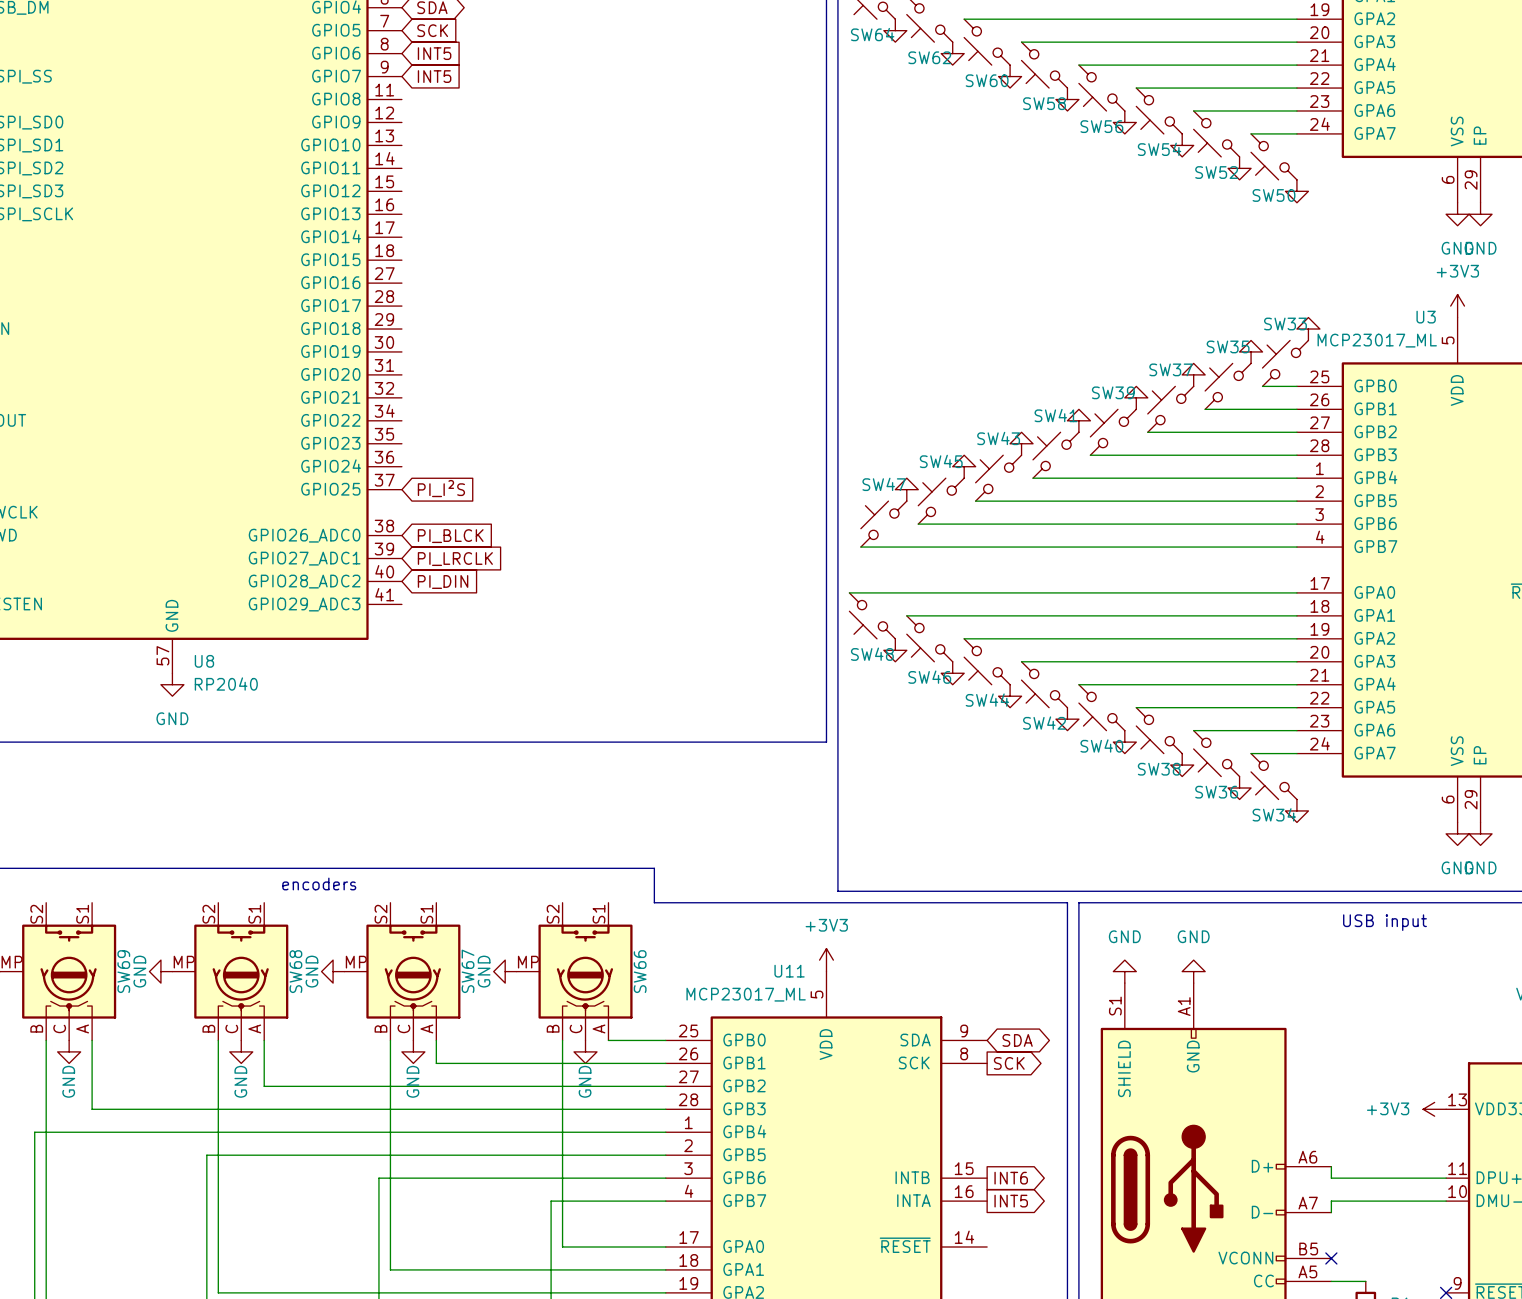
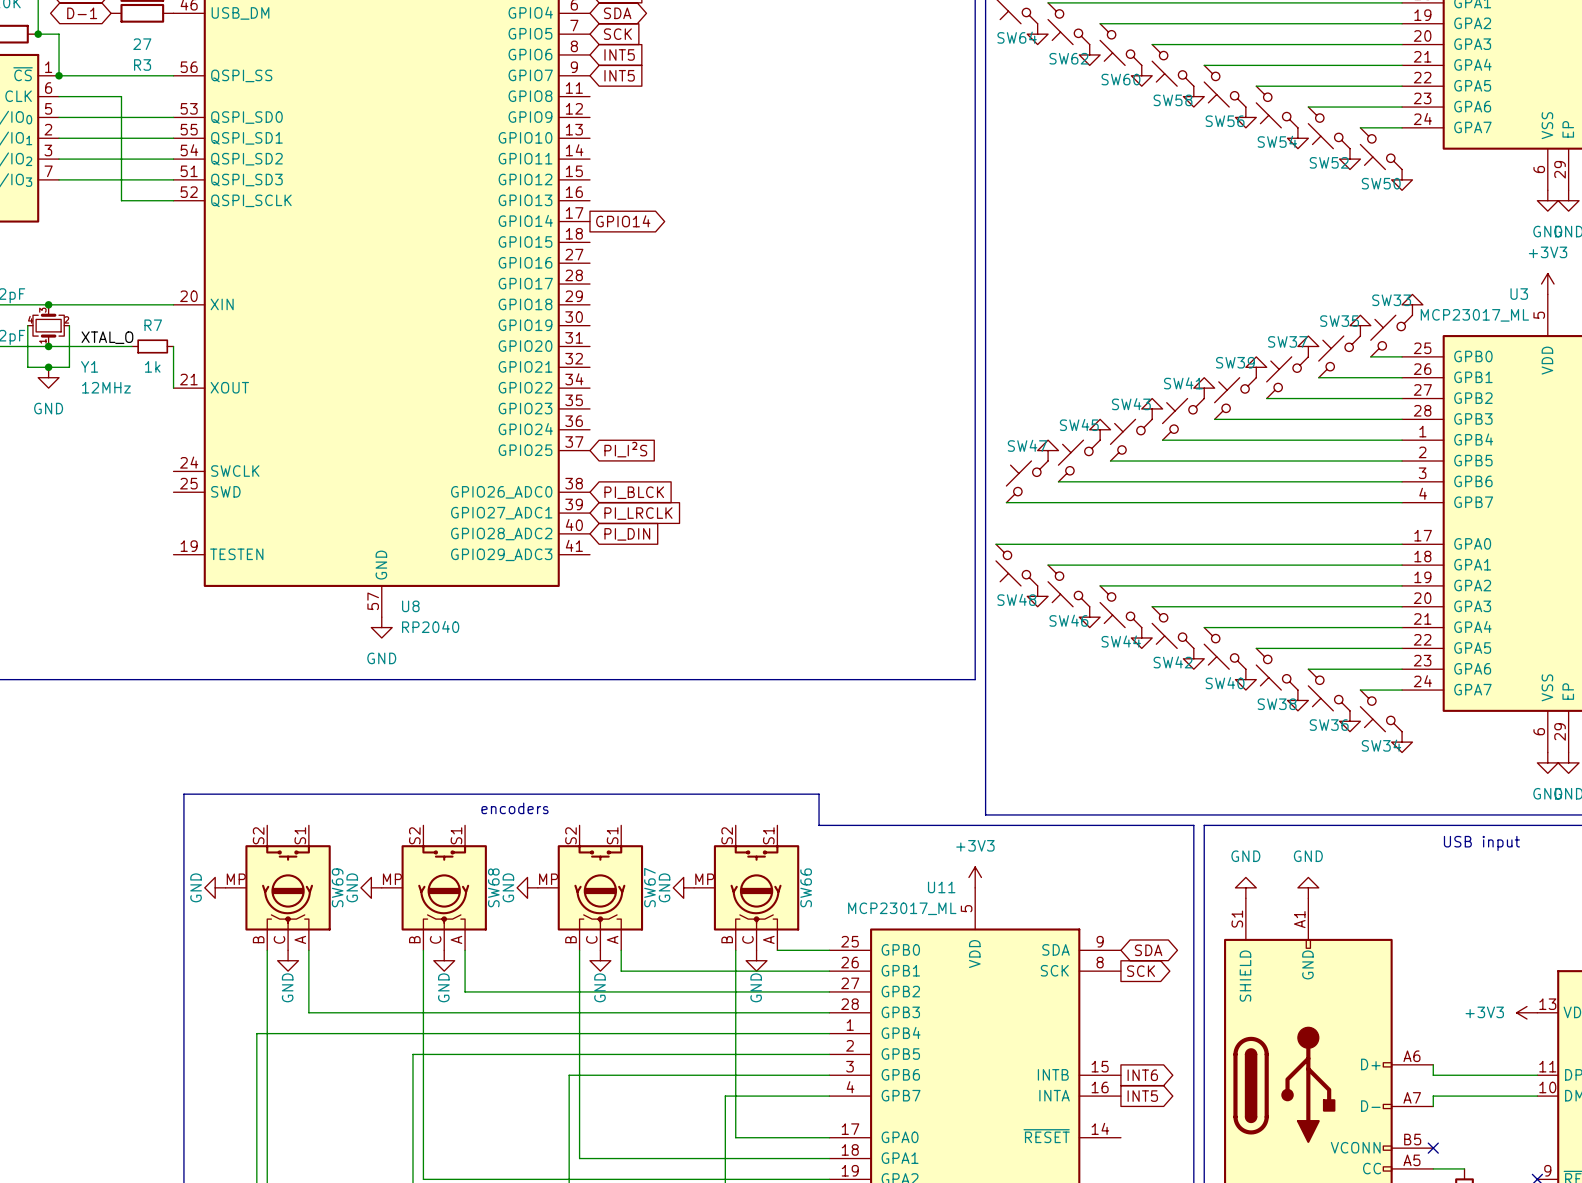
global label: none -> GPIO14 (623, 221)

